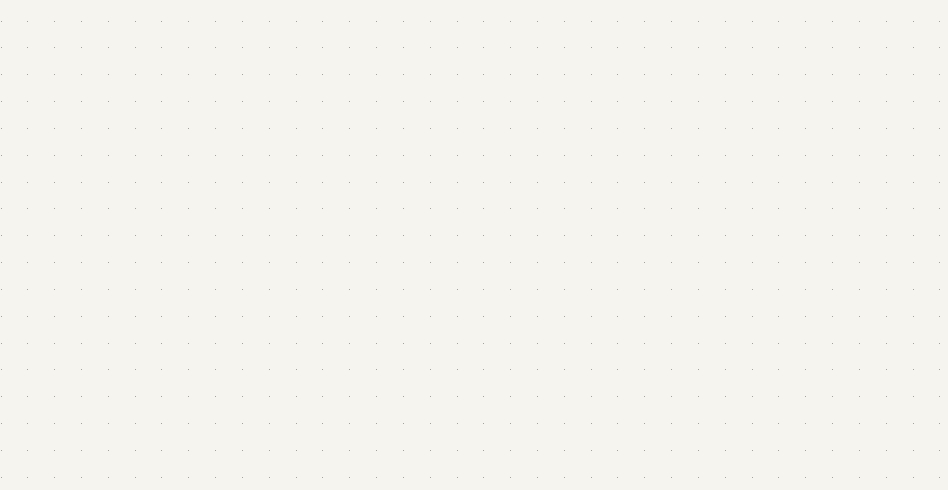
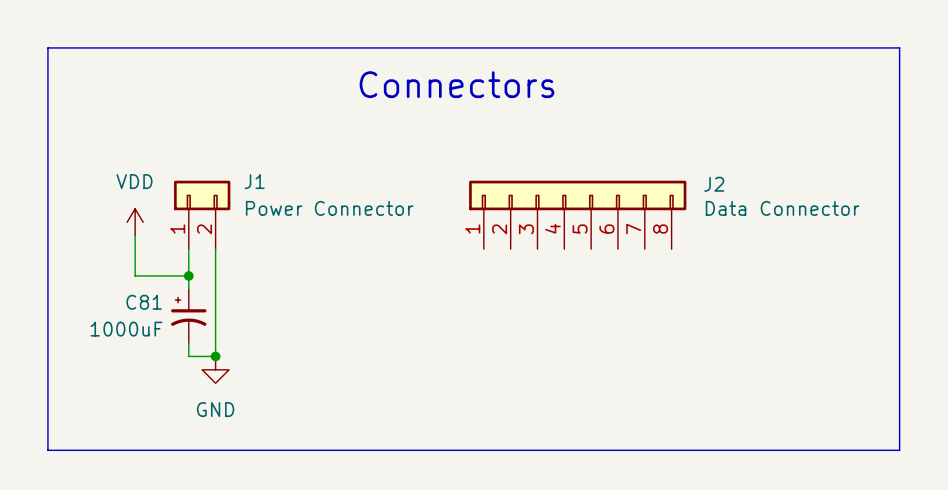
line: none -> (47, 47) (899, 47) (899, 450) (47, 450) (47, 47)
text: none -> Connectors (457, 84)
J1: none -> Power Connector (202, 214)
J2: none -> Data Connector (577, 214)
power symbol: none -> VDD (135, 222)
wire: none -> (135, 235) (135, 275) (188, 275)
wire: none -> (188, 249) (188, 289)
wire: none -> (215, 249) (215, 356) (188, 356) (188, 343)
junction: none -> (188, 275)
C81: none -> 1000uF (188, 316)
junction: none -> (215, 356)
power symbol: none -> GND (215, 369)

